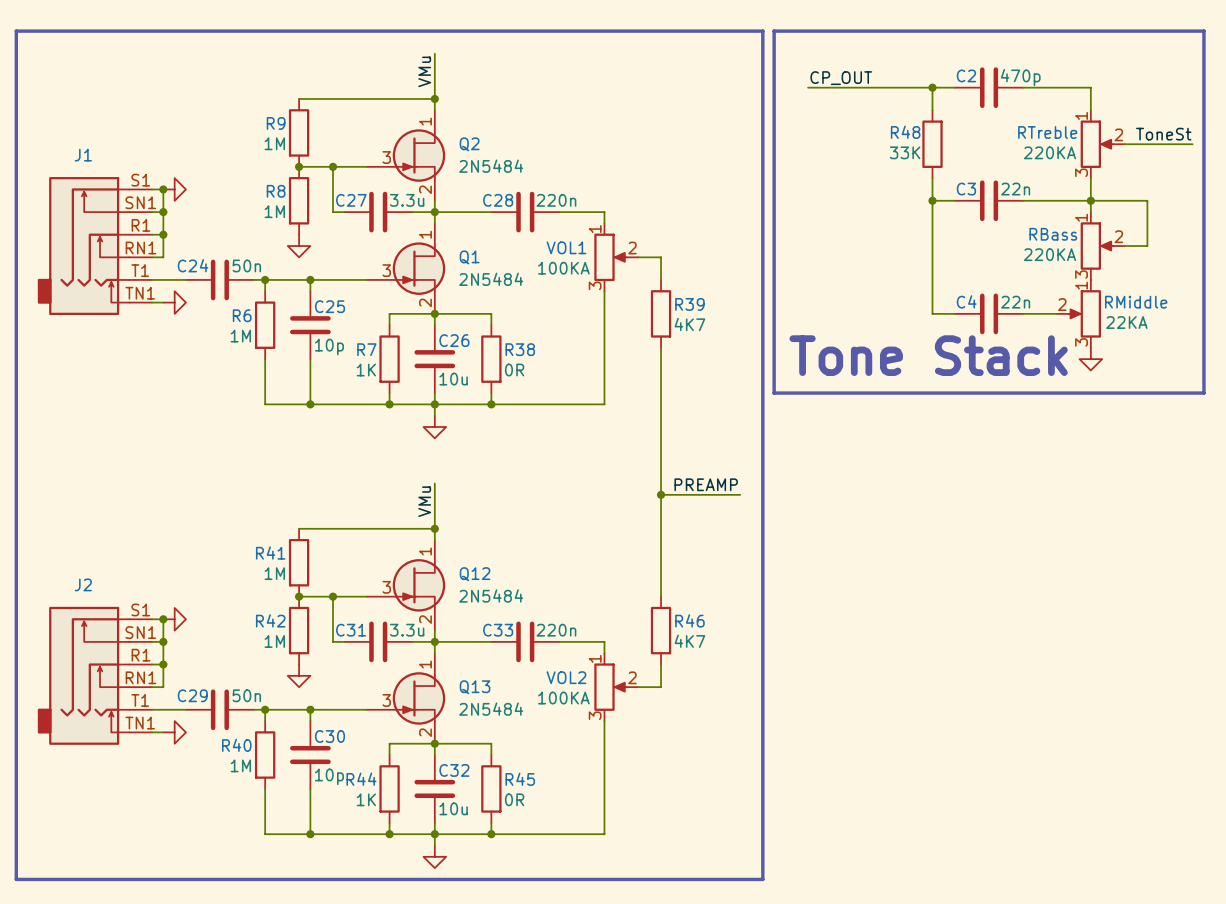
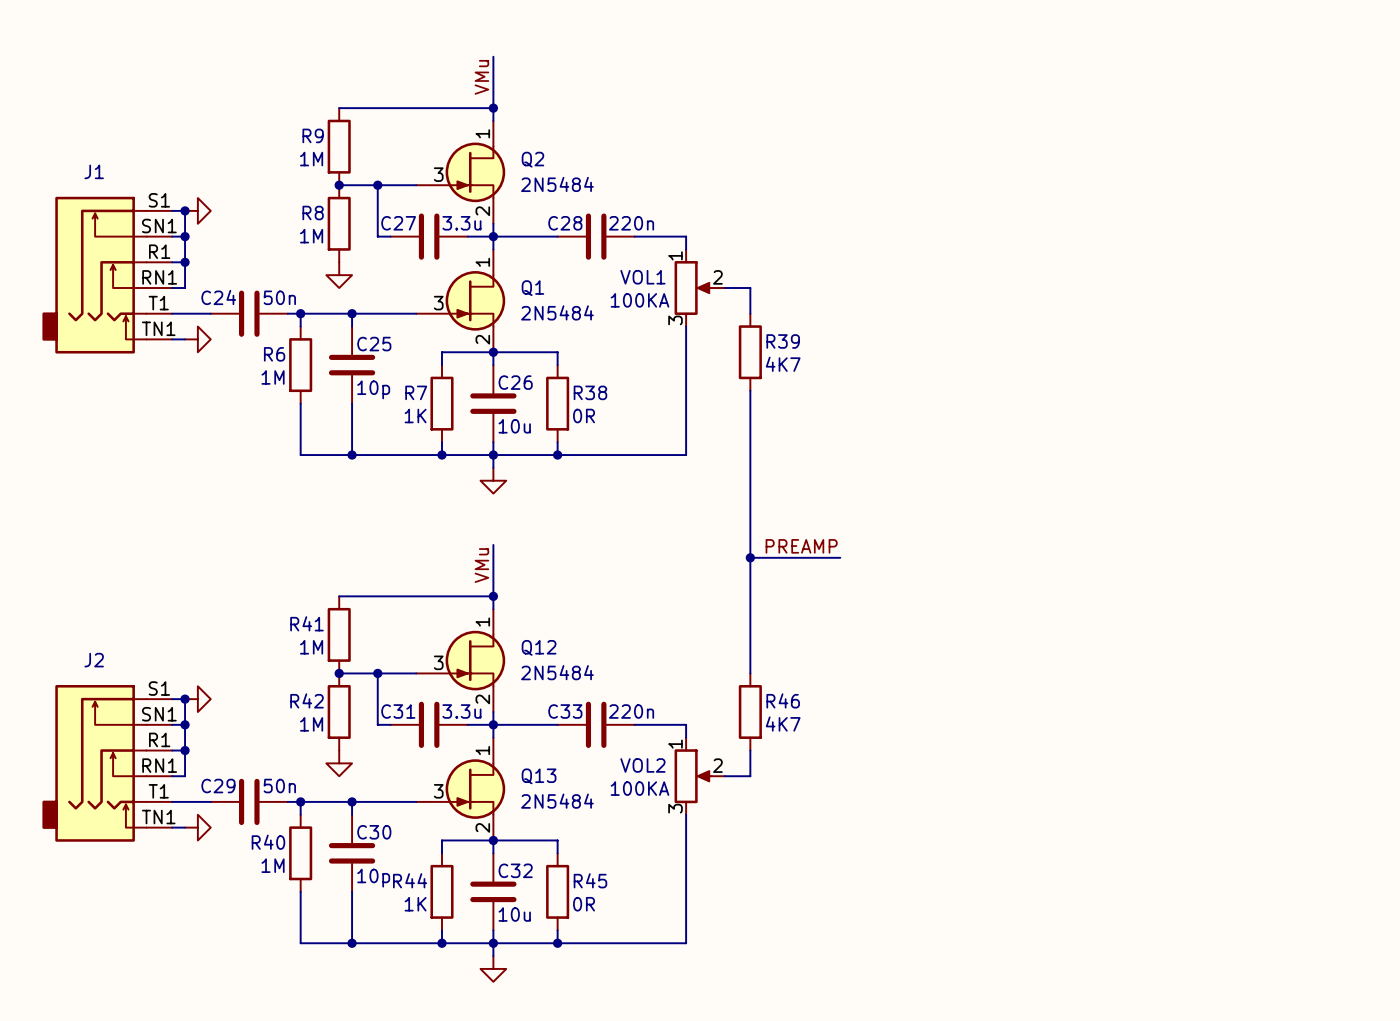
line: (16, 31) (762, 31) (762, 879) (16, 879) (16, 31) -> none
line: (774, 31) (1203, 31) (1203, 393) (774, 393) (774, 31) -> none
label: CP_OUT (841, 78) -> none
wire: (808, 87) (955, 87) -> none
wire: (932, 87) (932, 110) -> none
junction: (932, 87) -> none
C2: 470p (989, 87) -> none
wire: (1022, 87) (1090, 87) (1090, 110) -> none
label: ToneSt (1163, 134) -> none
R48: 33K (932, 144) -> none
RTreble: 220KA (1102, 144) -> none
wire: (1124, 144) (1192, 144) -> none
wire: (932, 178) (932, 313) (955, 313) -> none
wire: (1090, 178) (1090, 212) -> none
wire: (932, 200) (955, 200) -> none
junction: (932, 200) -> none
C3: 22n (989, 200) -> none
wire: (1022, 200) (1147, 200) (1147, 246) (1124, 246) -> none
junction: (1090, 200) -> none
RBass: 220KA (1102, 246) -> none
C4: 22n (989, 313) -> none
wire: (1022, 313) (1056, 313) -> none
RMiddle: 22KA (1078, 313) -> none
text: Tone Stack (928, 355) -> none
power symbol: (1090, 359) -> none

